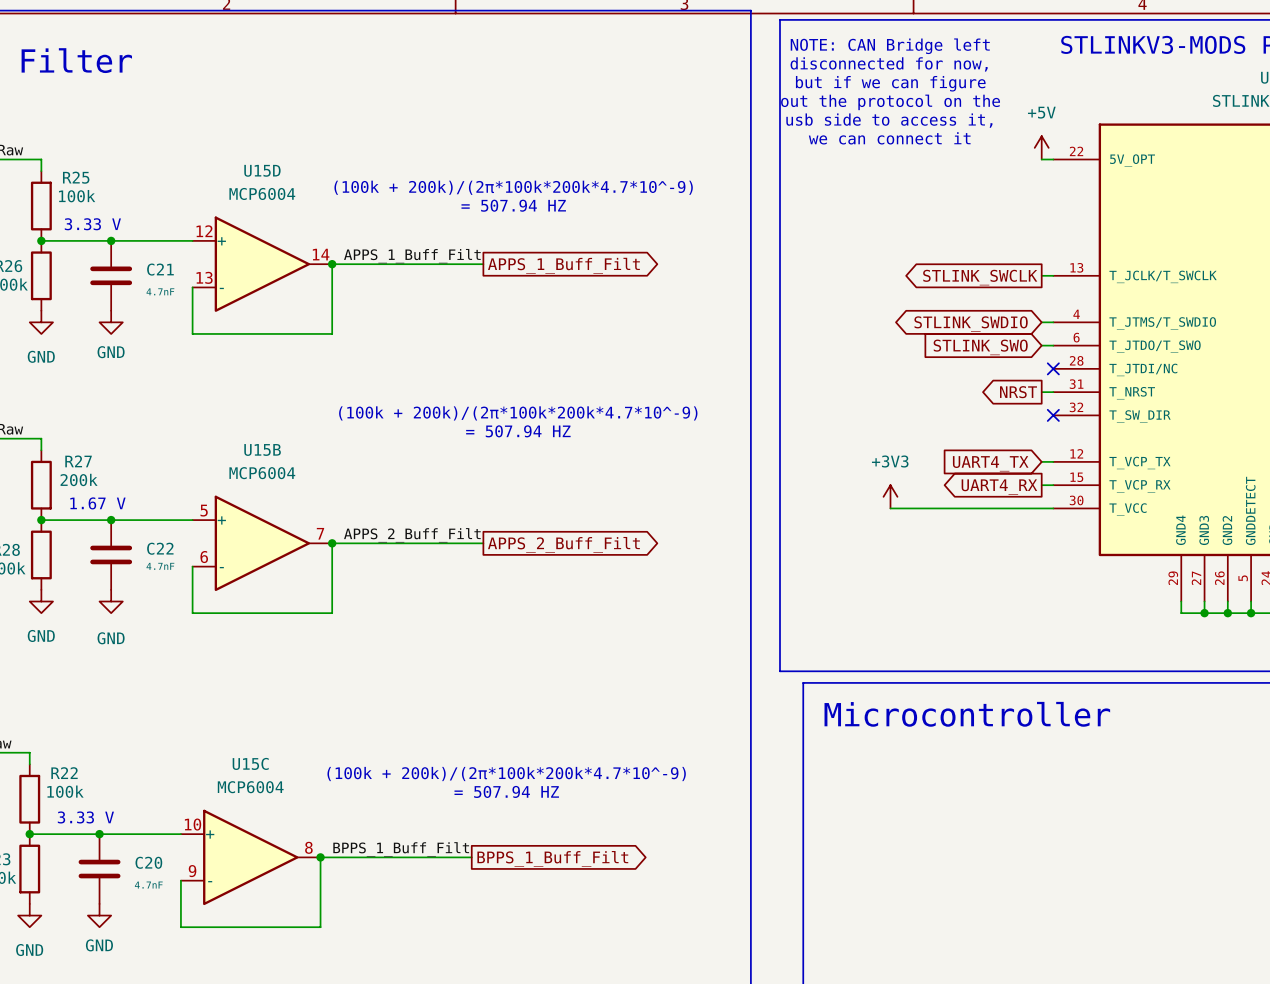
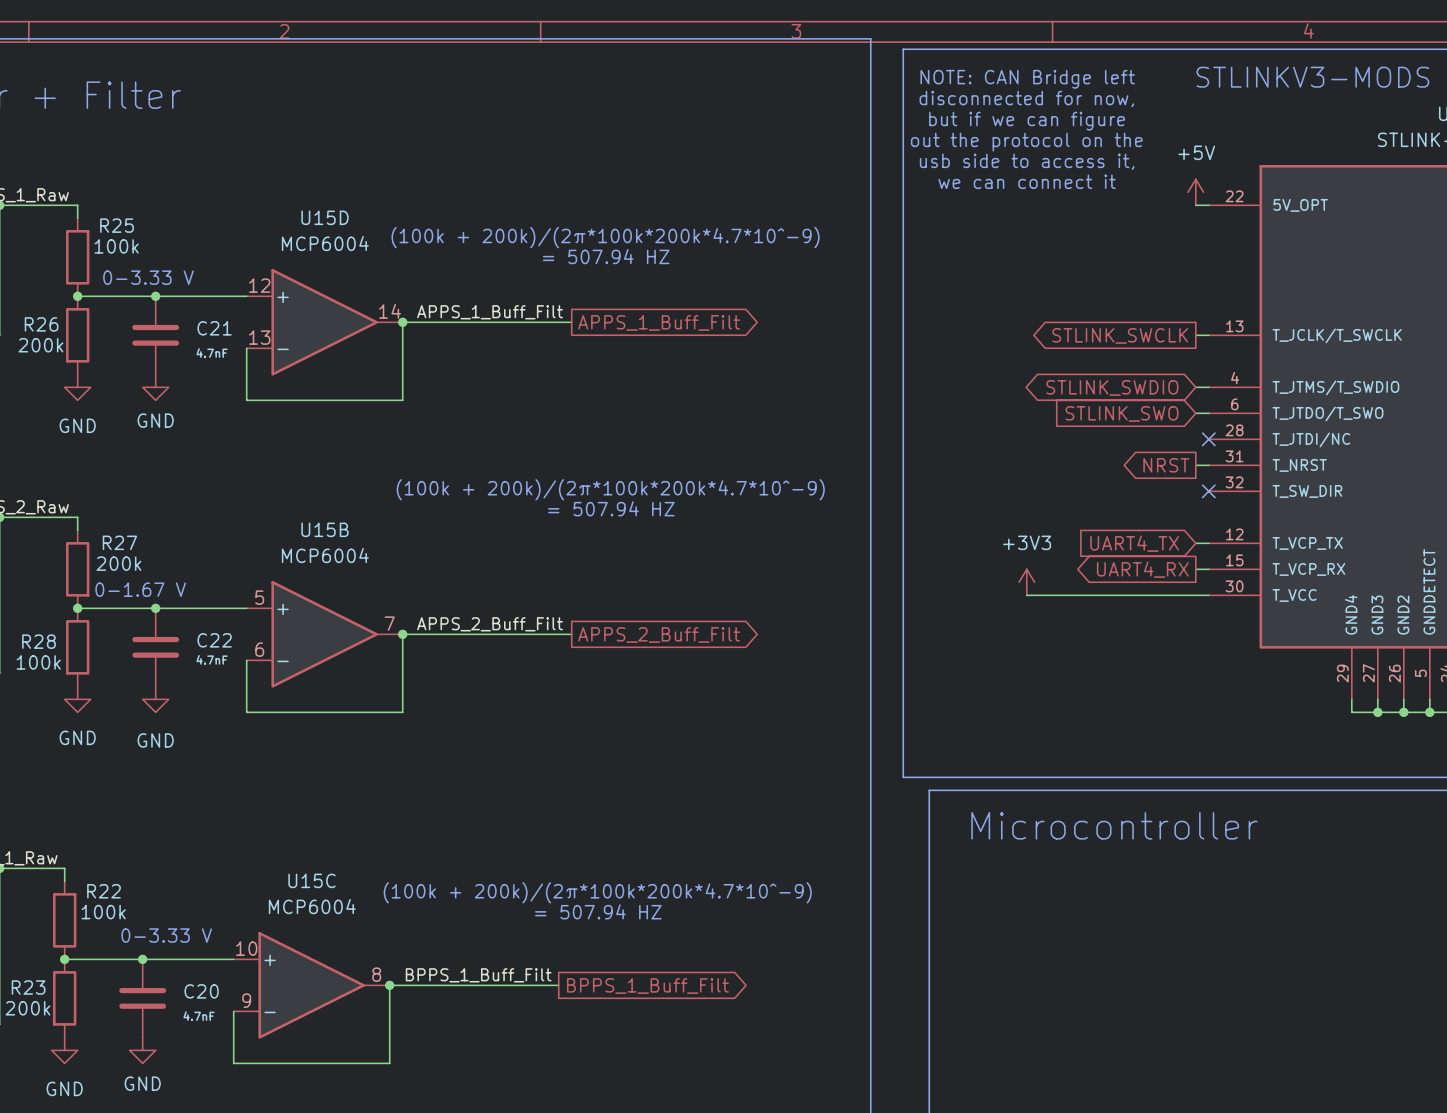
text: 3.33 V (92, 224) -> 0-3.33 V (148, 277)
text: 1.67 V (97, 503) -> 0-1.67 V (140, 589)
text: 3.33 V (85, 817) -> 0-3.33 V (166, 935)

